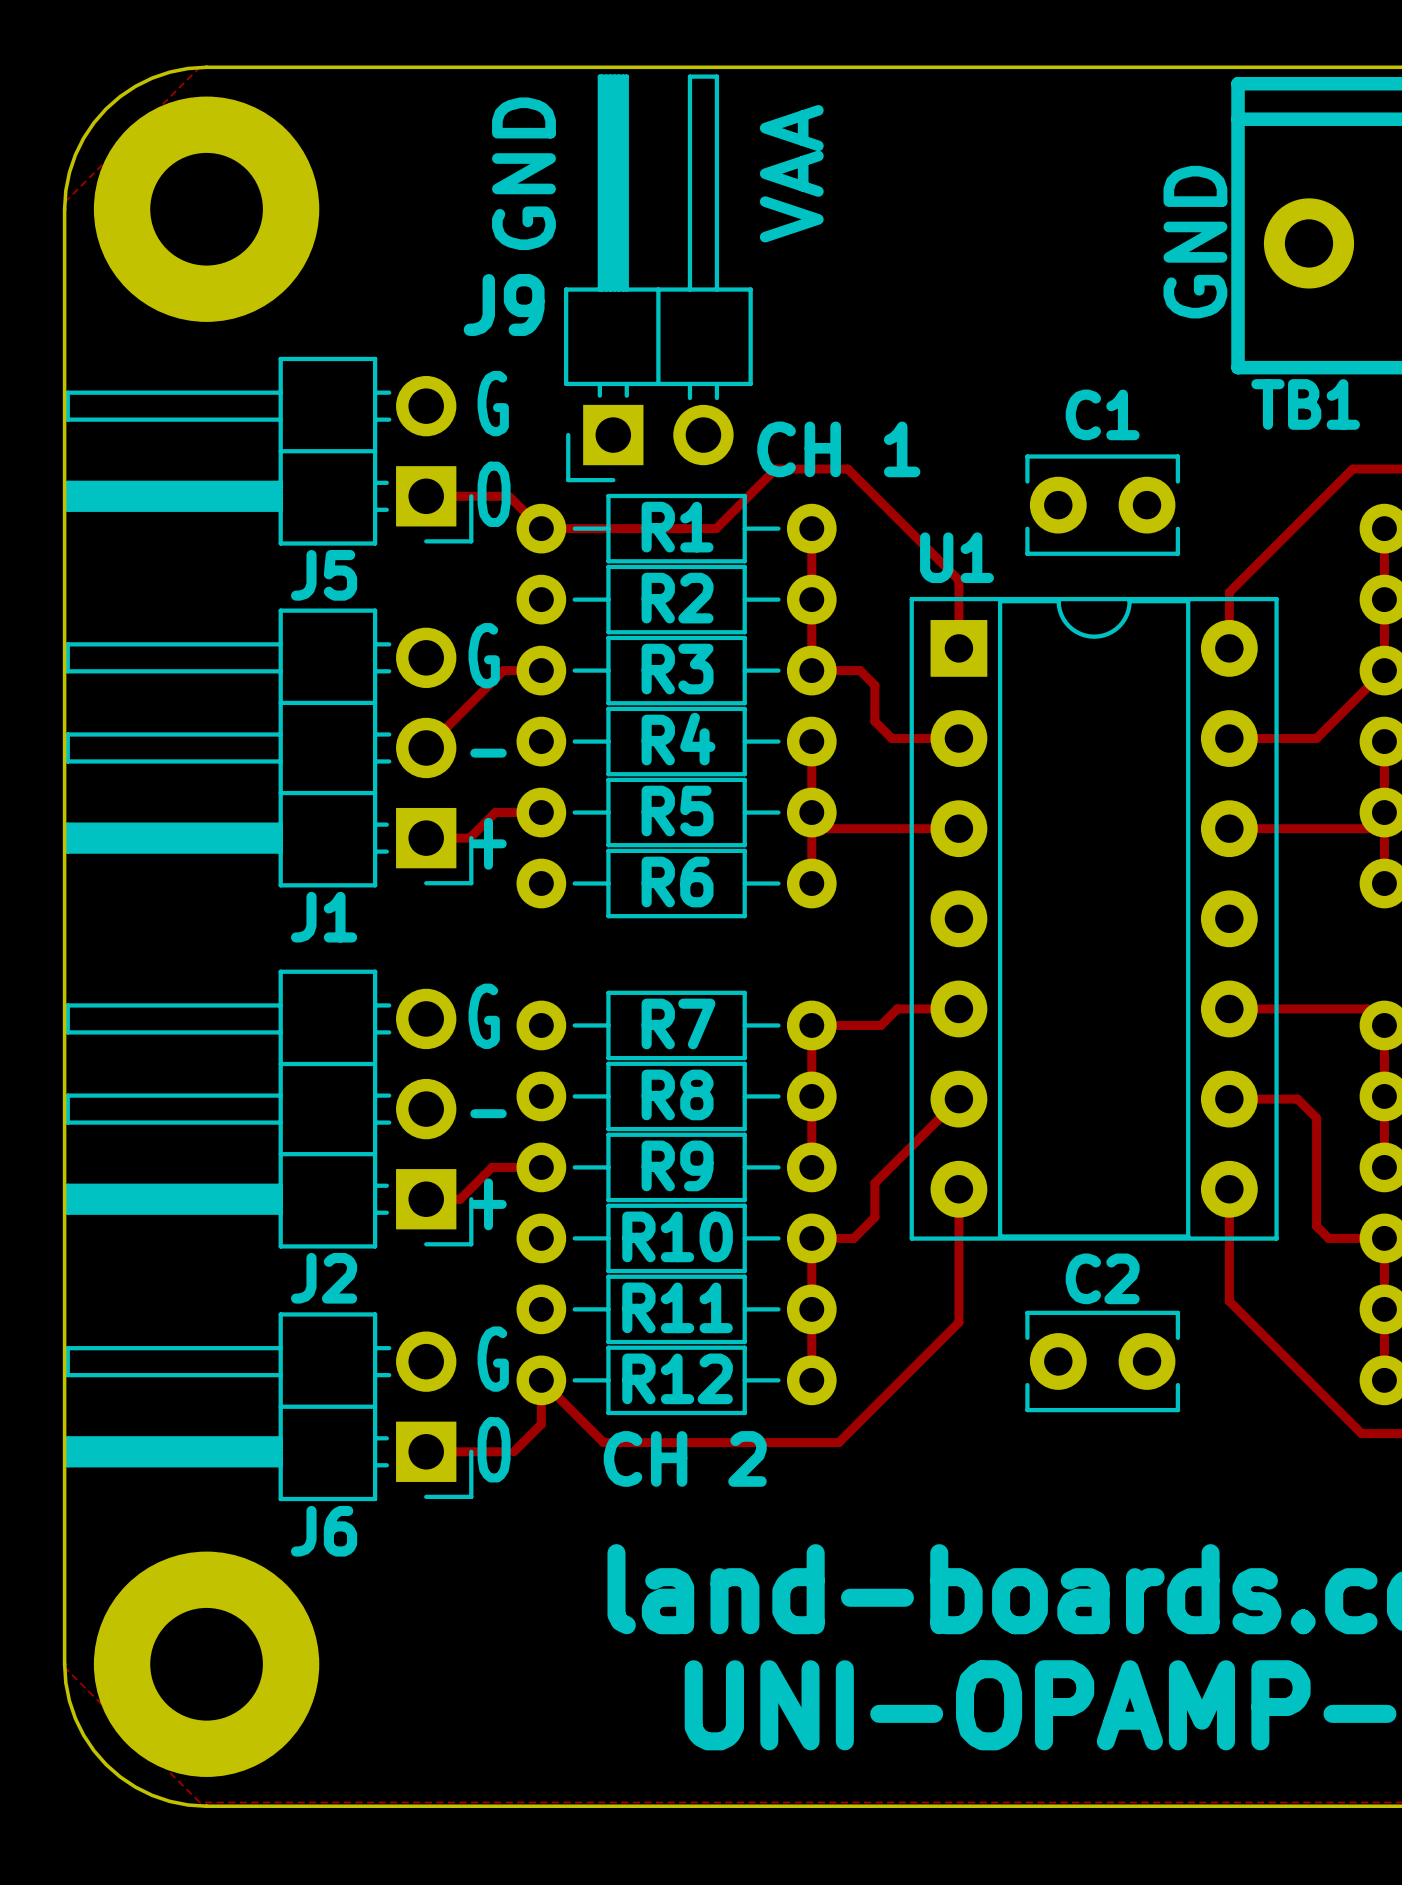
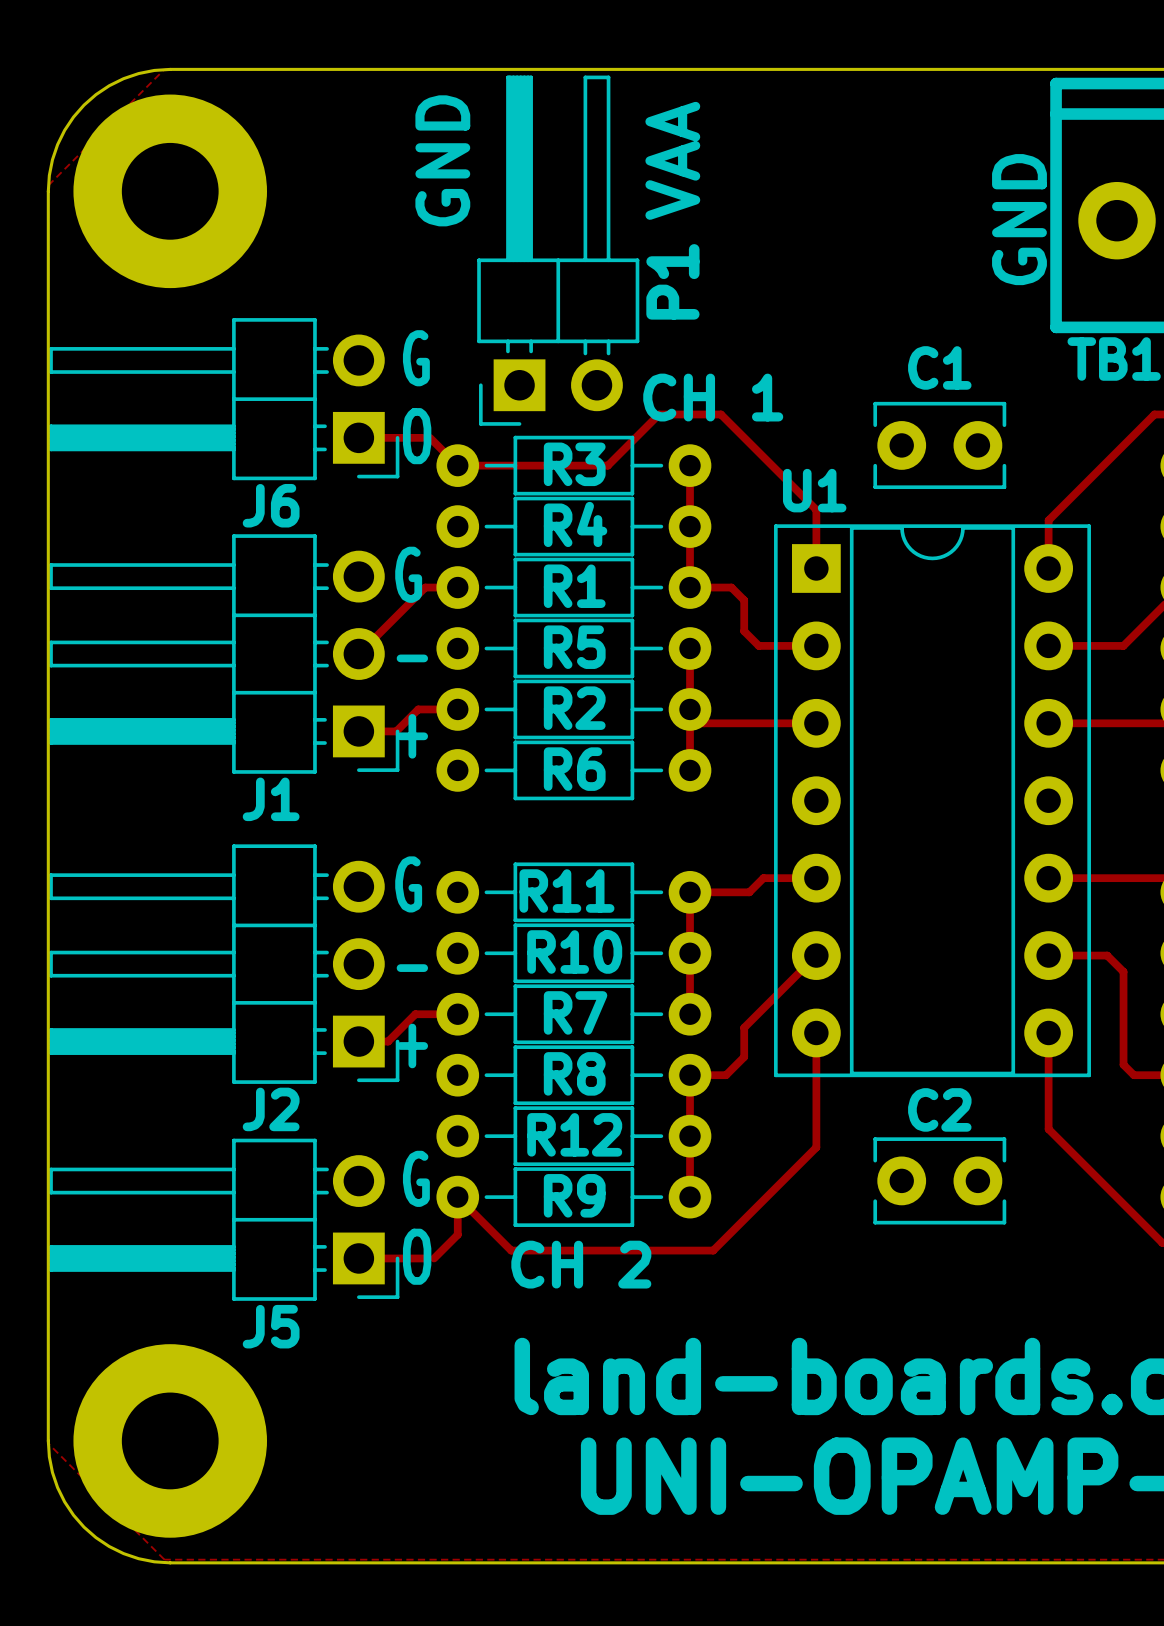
J9 name: J9 (504, 304) -> P1 (672, 281)
R1 name: R1 (677, 527) -> R3 (574, 464)
J5 name: J5 (324, 575) -> J6 (271, 505)
R2 name: R2 (677, 598) -> R4 (575, 524)
R3 name: R3 (677, 669) -> R1 (574, 586)
R4 name: R4 (678, 739) -> R5 (574, 647)
R5 name: R5 (677, 811) -> R2 (574, 708)
R7 name: R7 (678, 1023) -> R11 (566, 891)
R8 name: R8 (677, 1094) -> R10 (574, 951)
R9 name: R9 (677, 1165) -> R7 (575, 1012)
R10 name: R10 (677, 1236) -> R8 (574, 1073)
R11 name: R11 (677, 1307) -> R12 (574, 1134)
R12 name: R12 (677, 1378) -> R9 (574, 1195)
J6 name: J6 (324, 1531) -> J5 (271, 1326)

